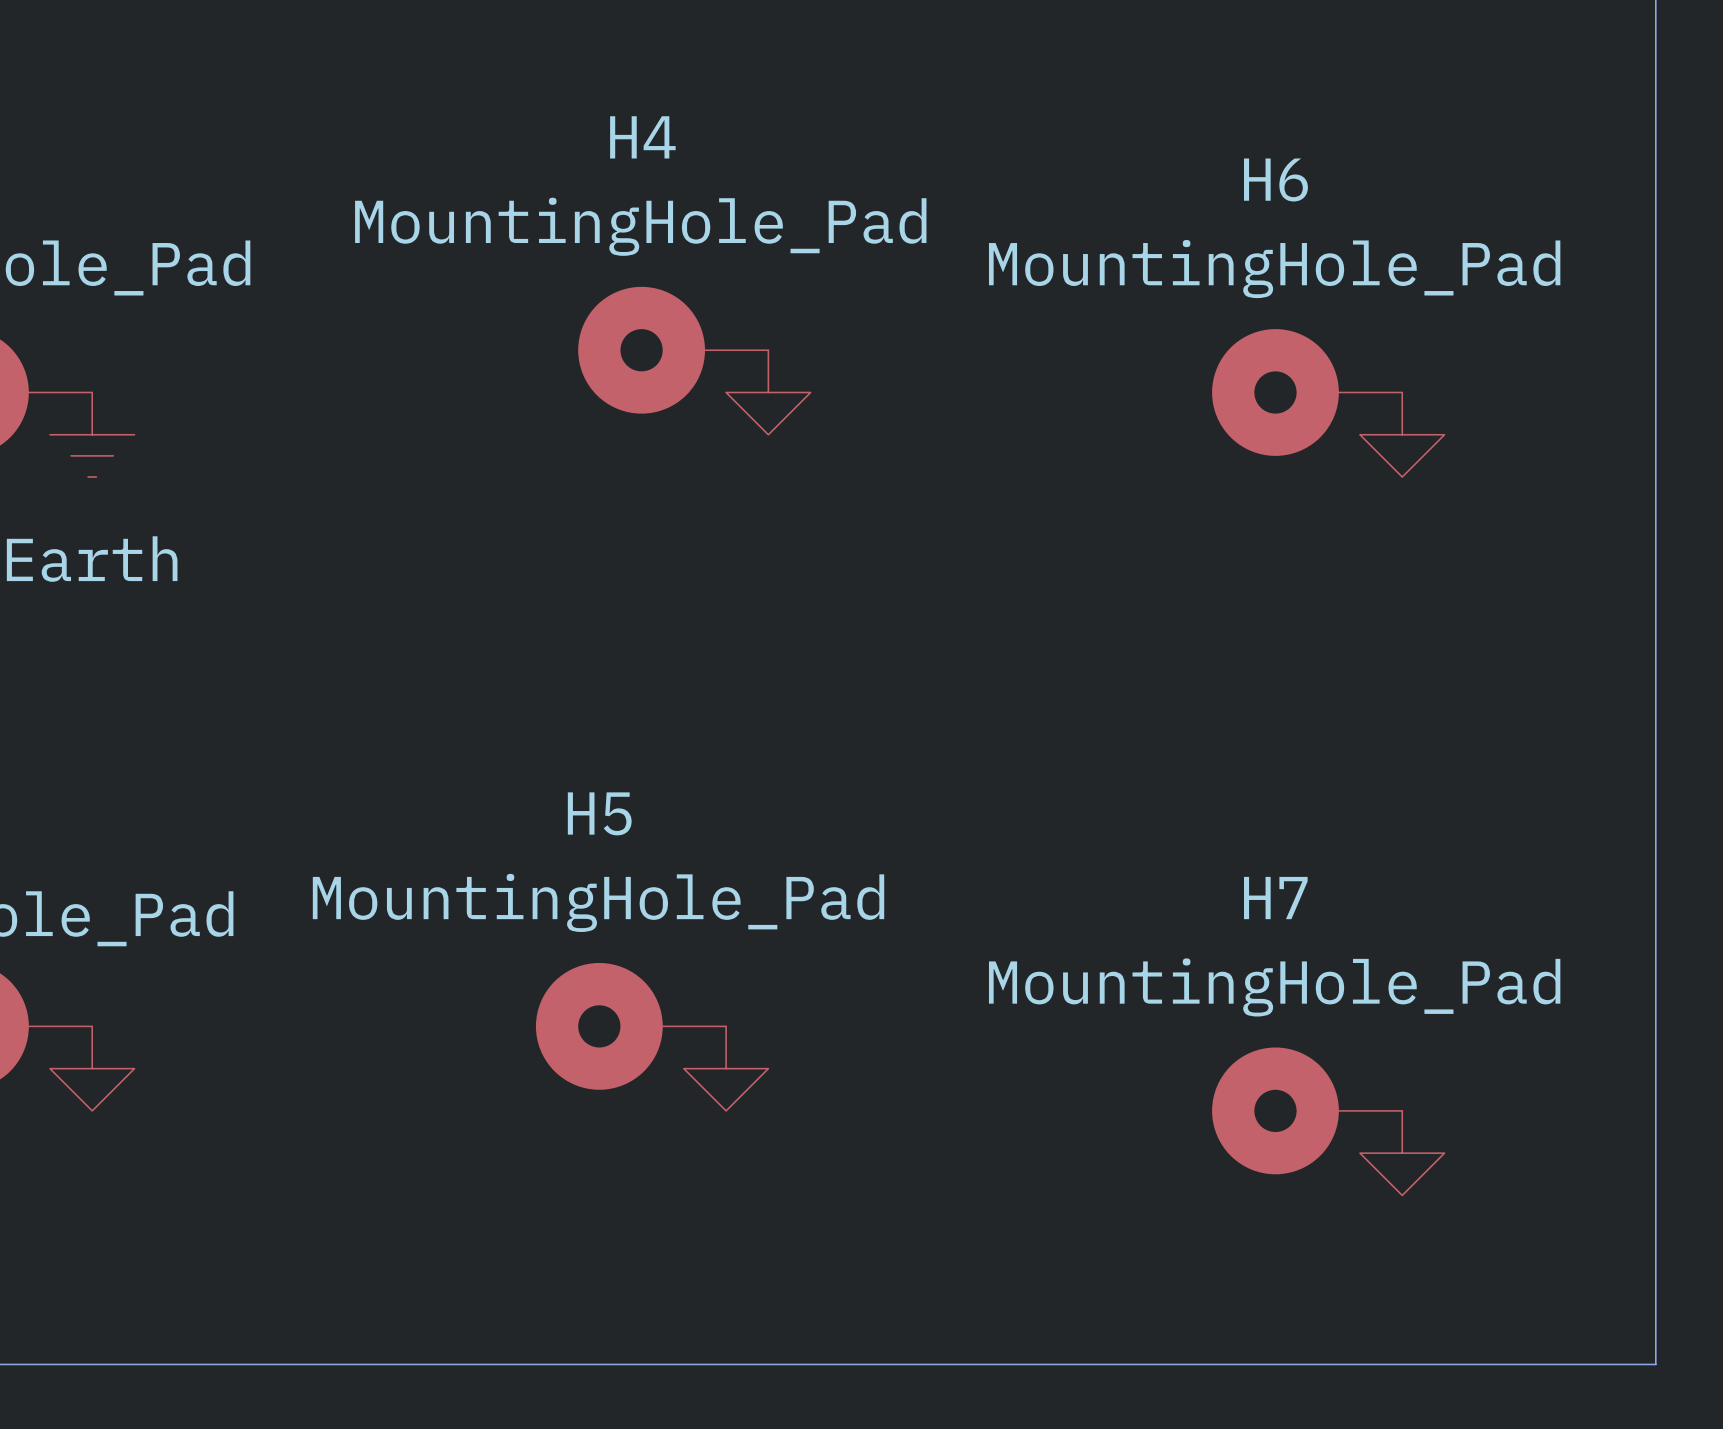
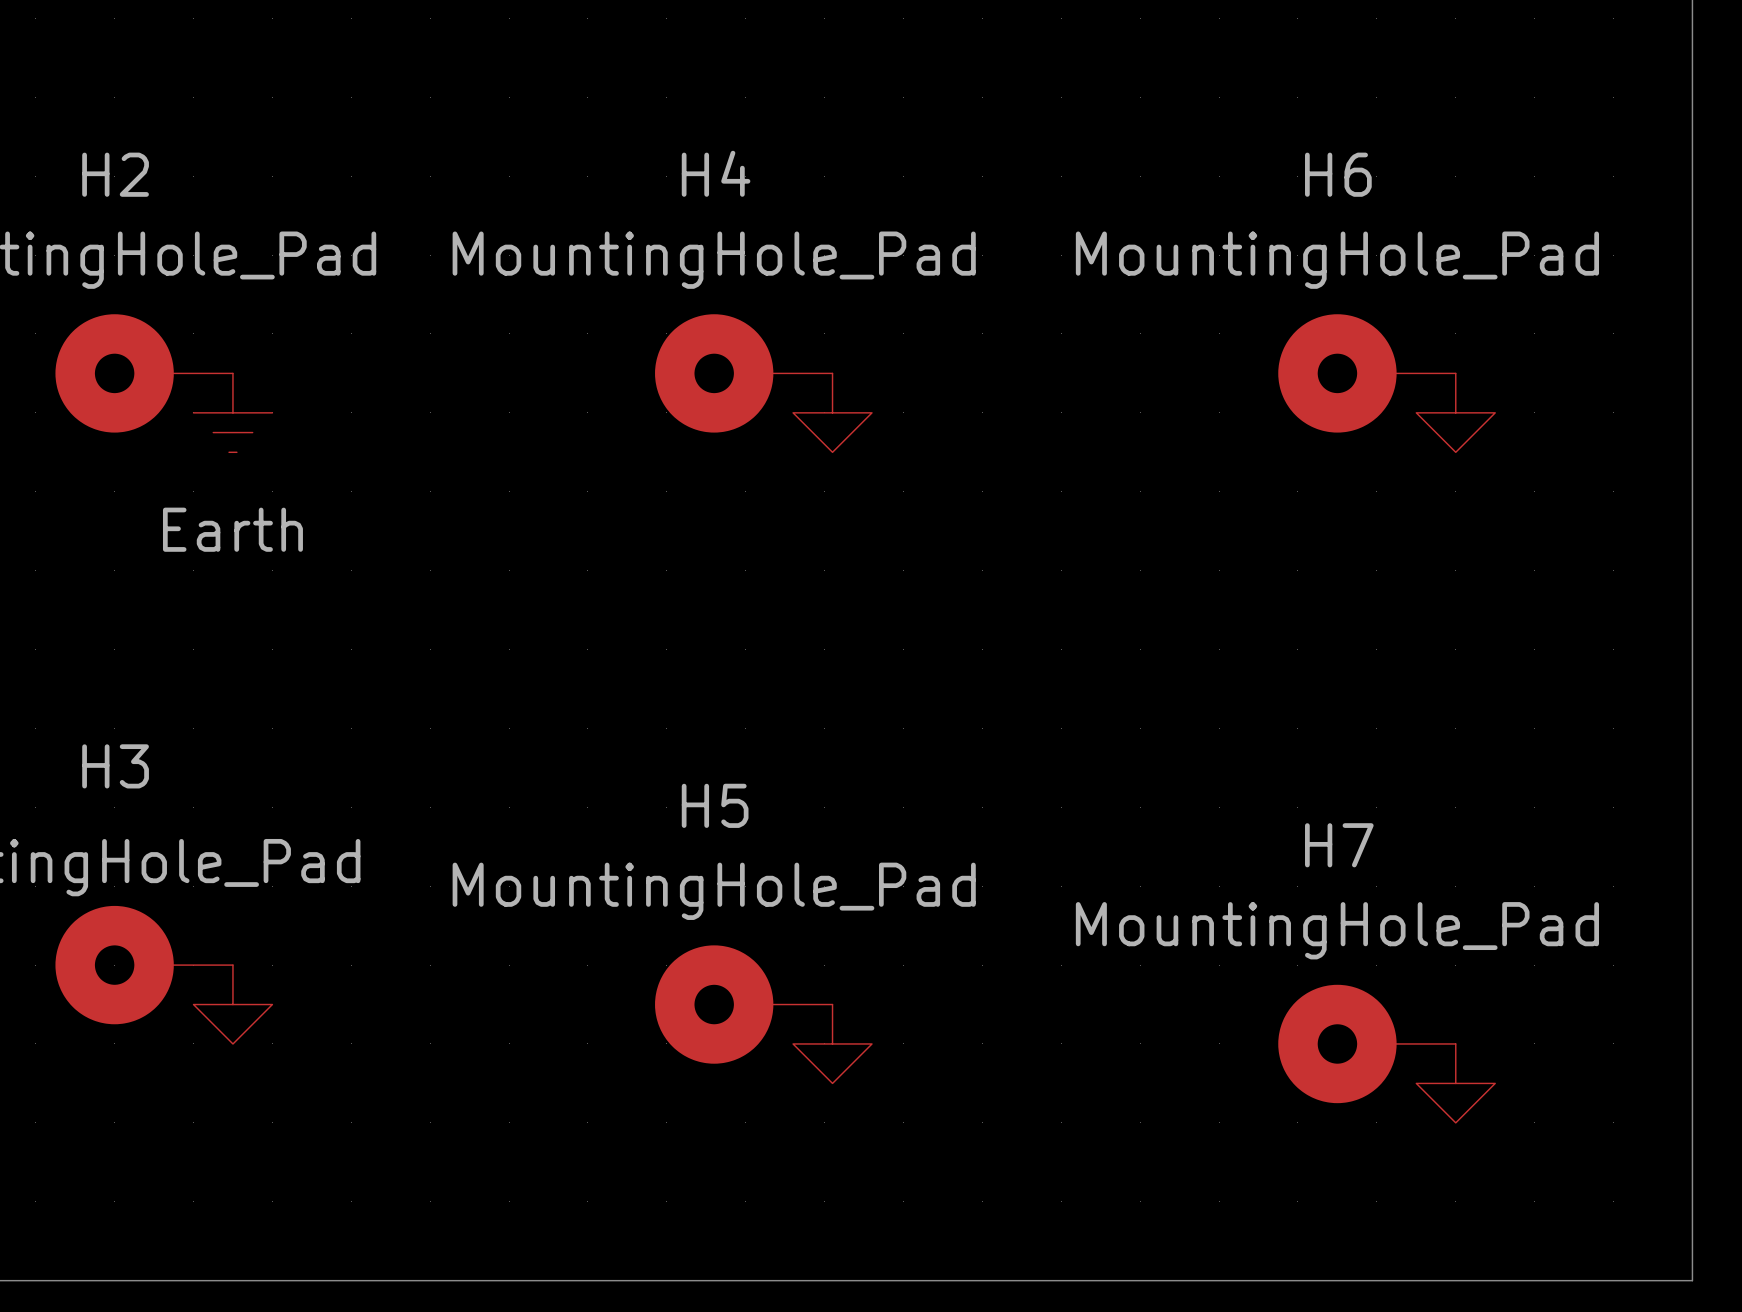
H4 position: (673, 350) -> (743, 373)
power symbol position: (768, 392) -> (832, 412)
H5 position: (631, 1026) -> (743, 1004)
power symbol position: (726, 1068) -> (832, 1043)

